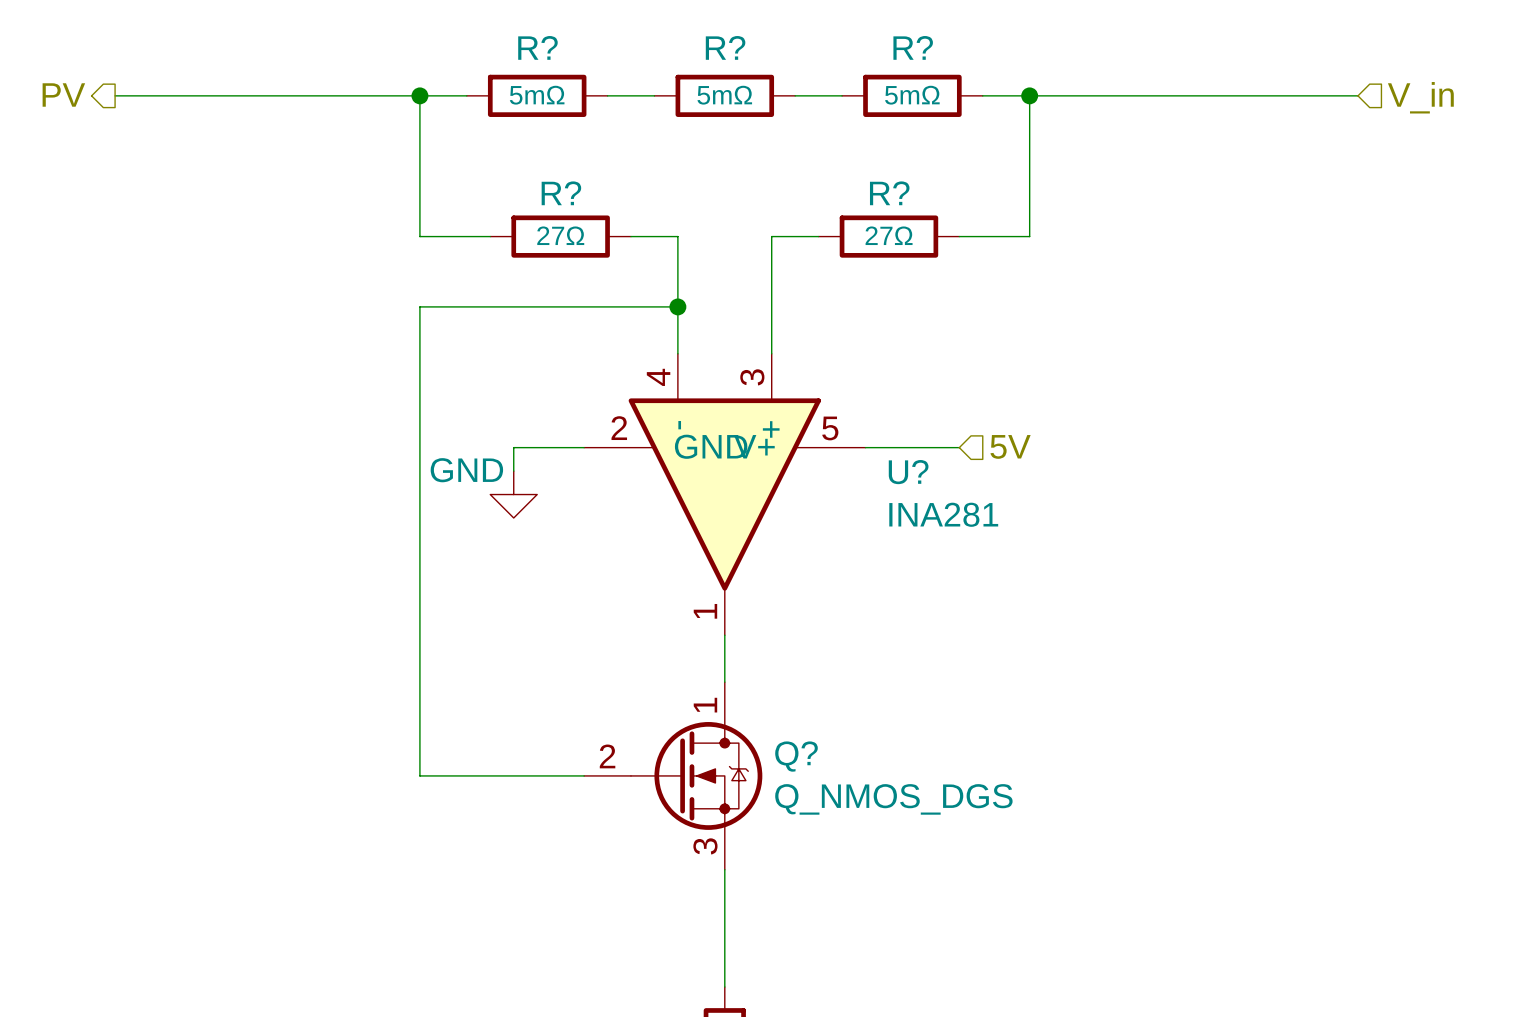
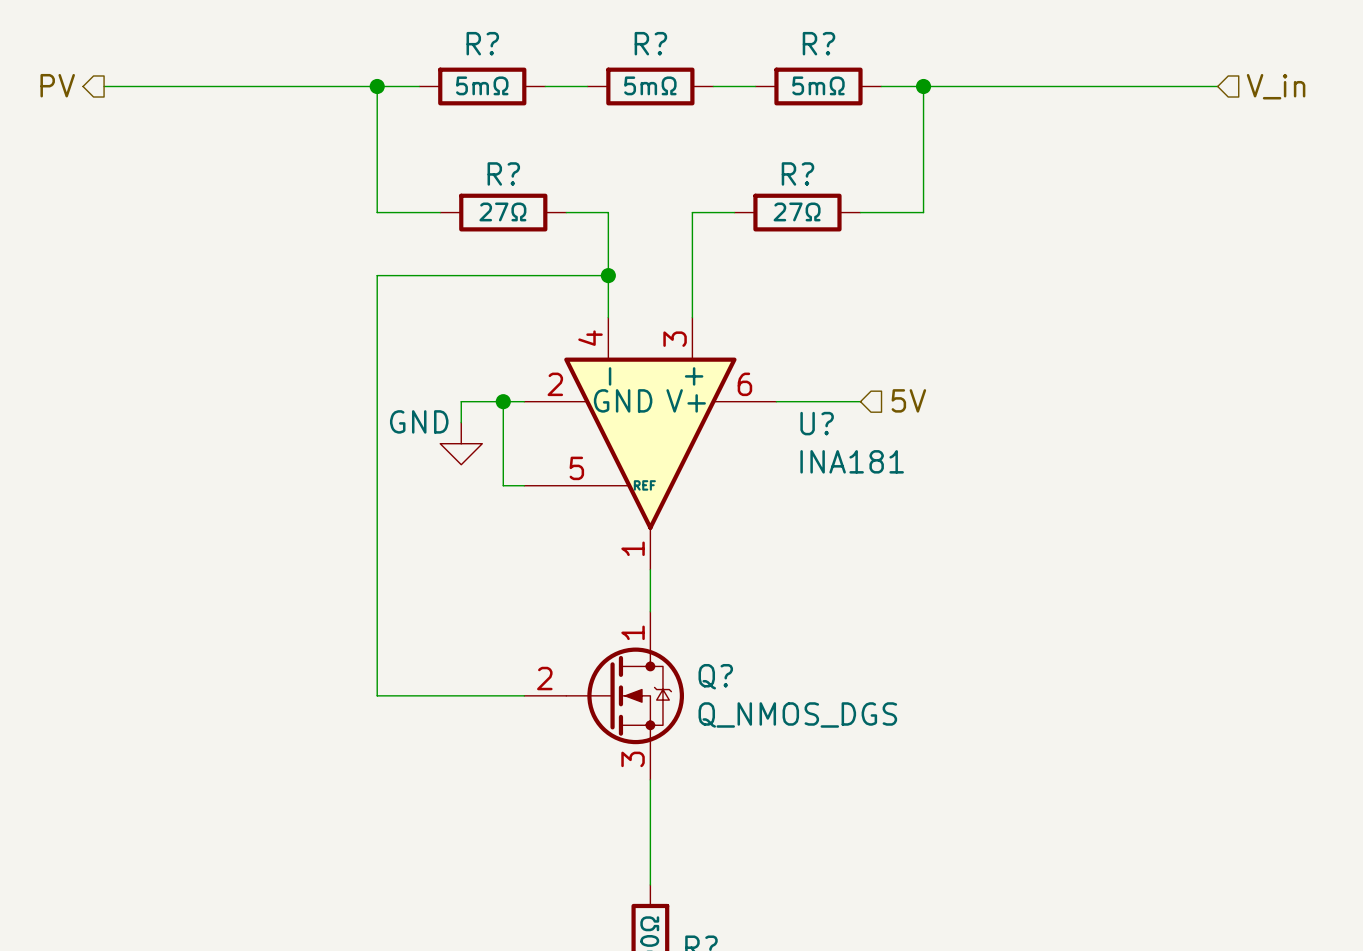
U? symbol: [584, 353, 866, 636] -> [524, 317, 777, 570]
wire: none -> (503, 401) (503, 485) (524, 485)
junction: none -> (503, 401)
U? value: INA281 (943, 514) -> INA181 (852, 461)

